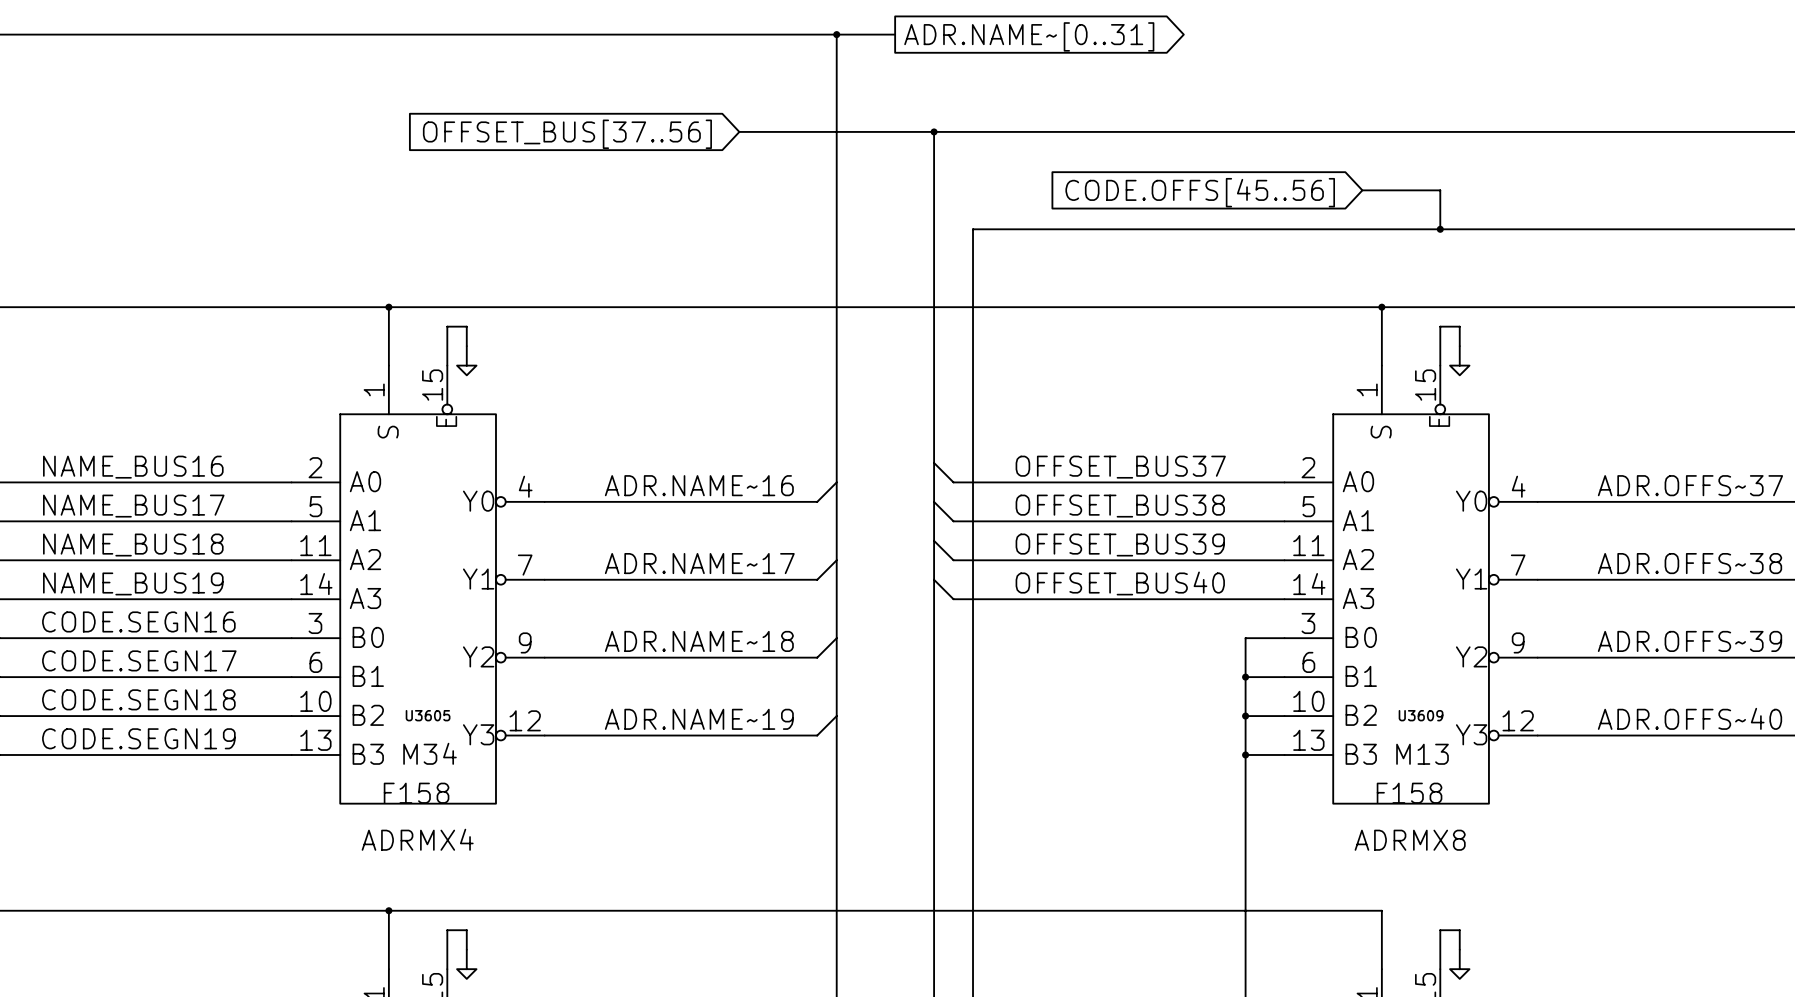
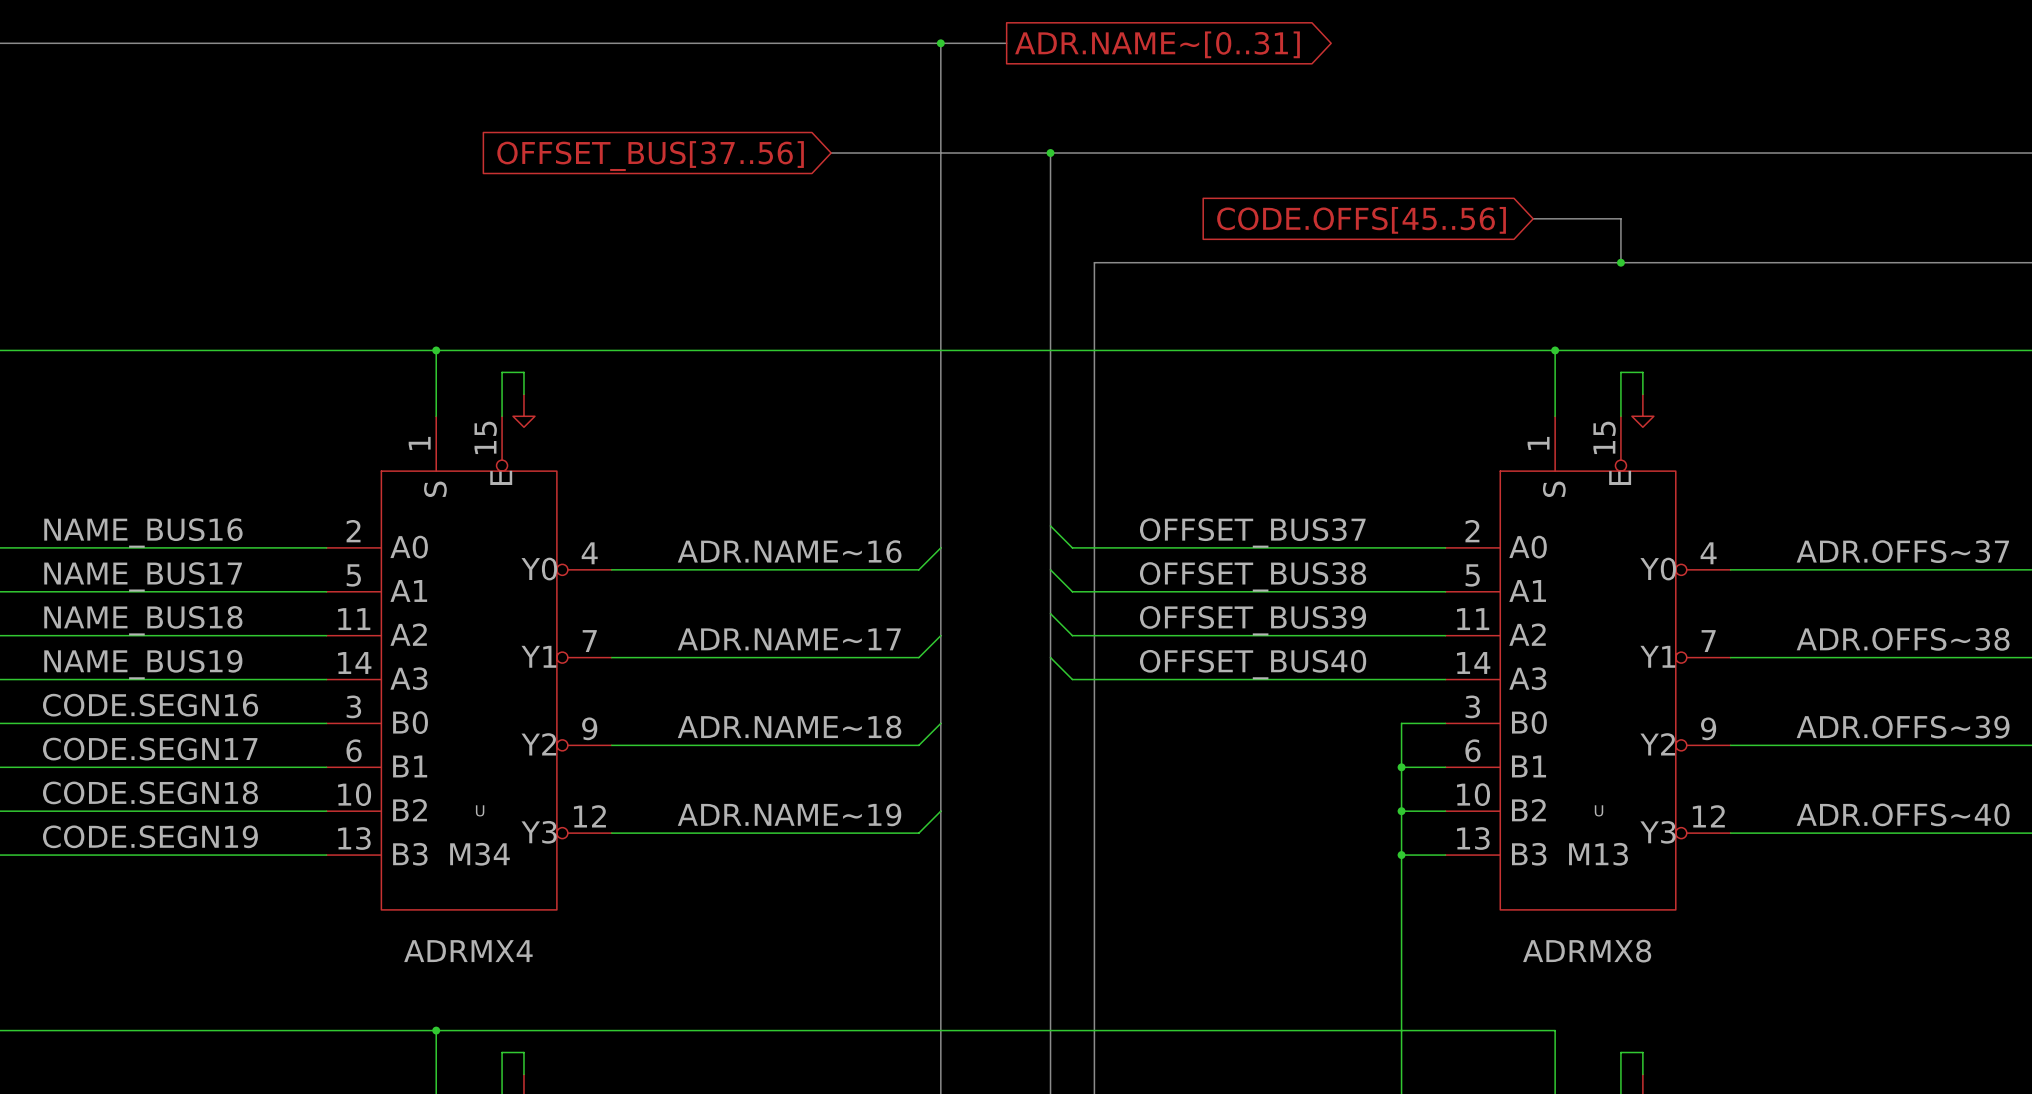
U3605 name: U3605 (428, 715) -> U (480, 810)
U3609 name: U3609 (1421, 715) -> U (1599, 810)
U3605 value: F158 (416, 793) -> none
U3609 value: F158 (1409, 793) -> none

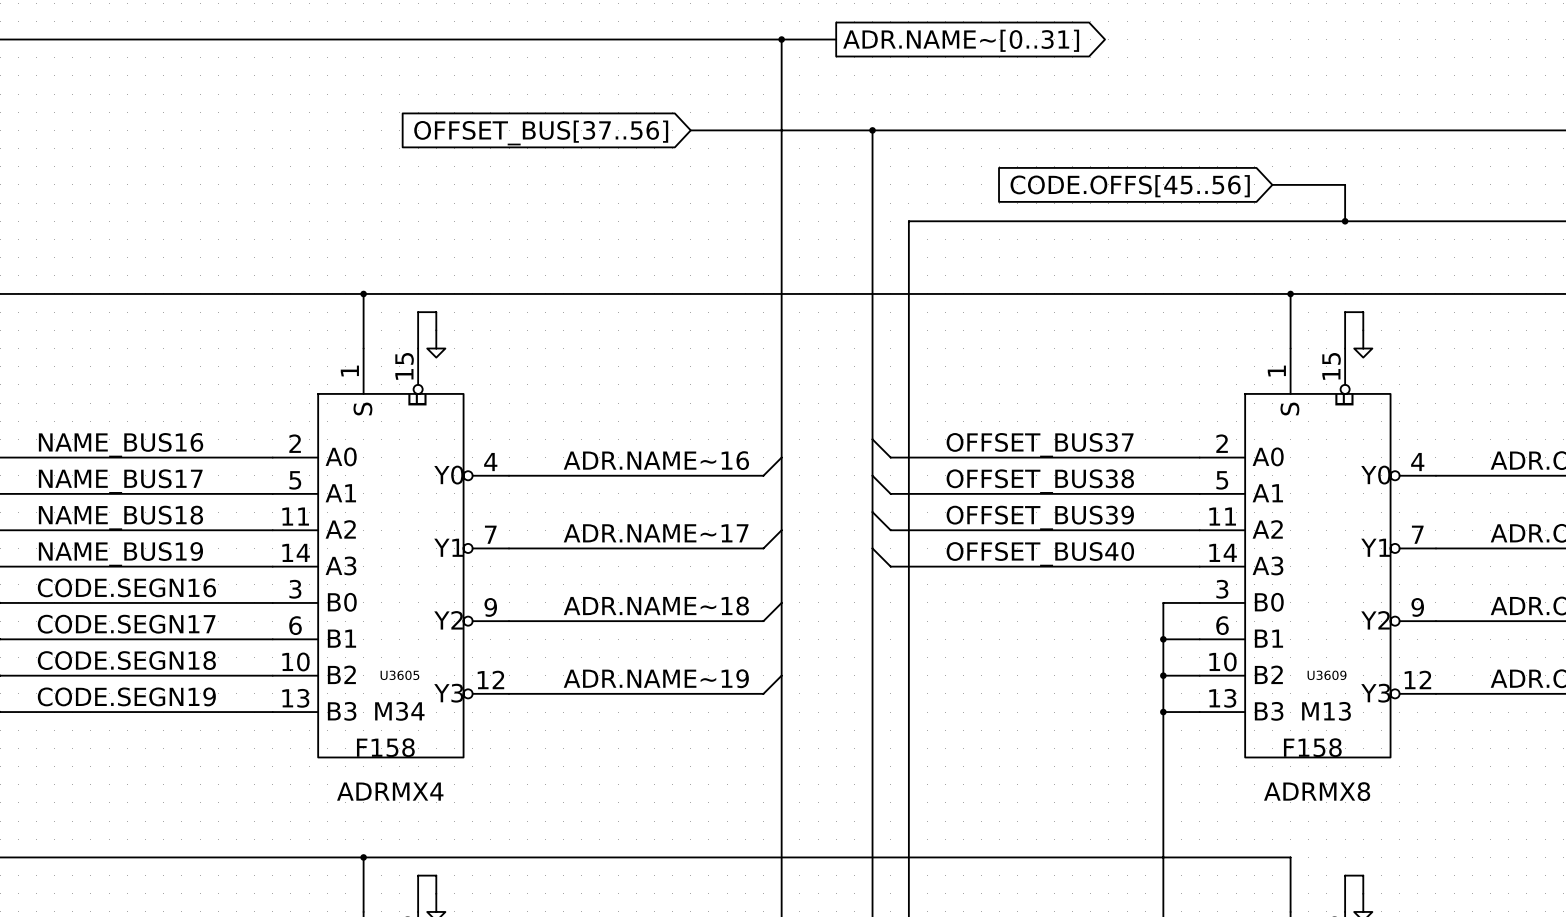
U name: U (480, 810) -> U3605 (399, 675)
U name: U (1599, 810) -> U3609 (1327, 675)
U value: none -> F158 (385, 747)
U value: none -> F158 (1312, 747)

